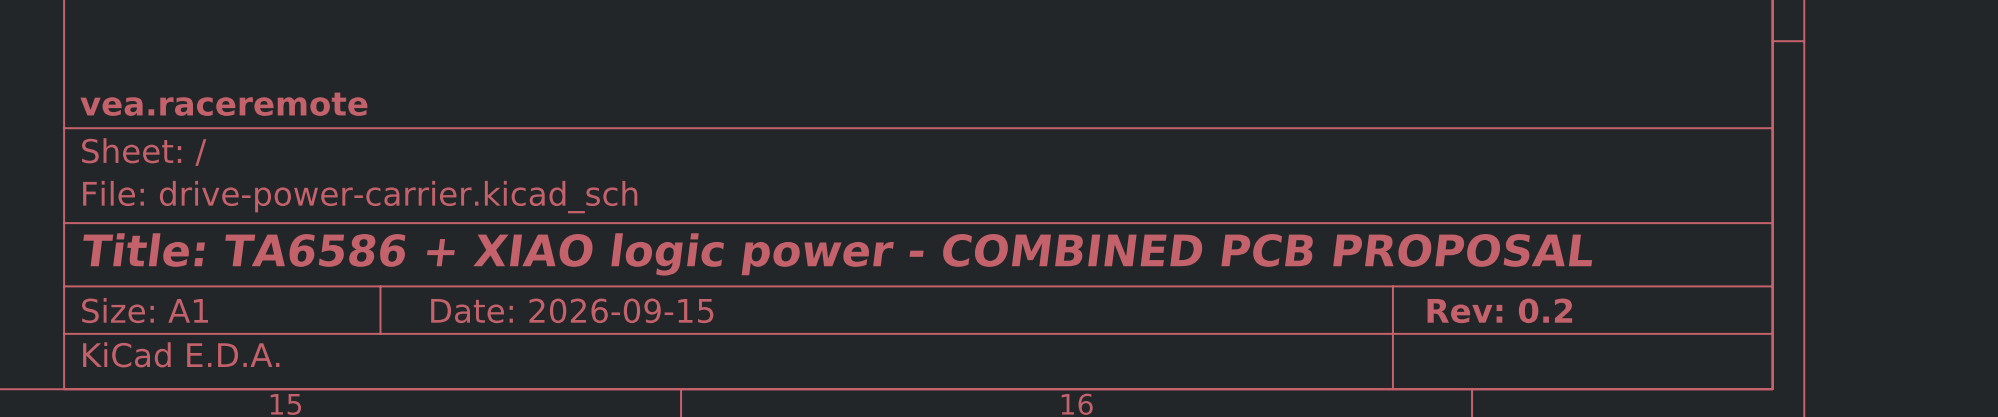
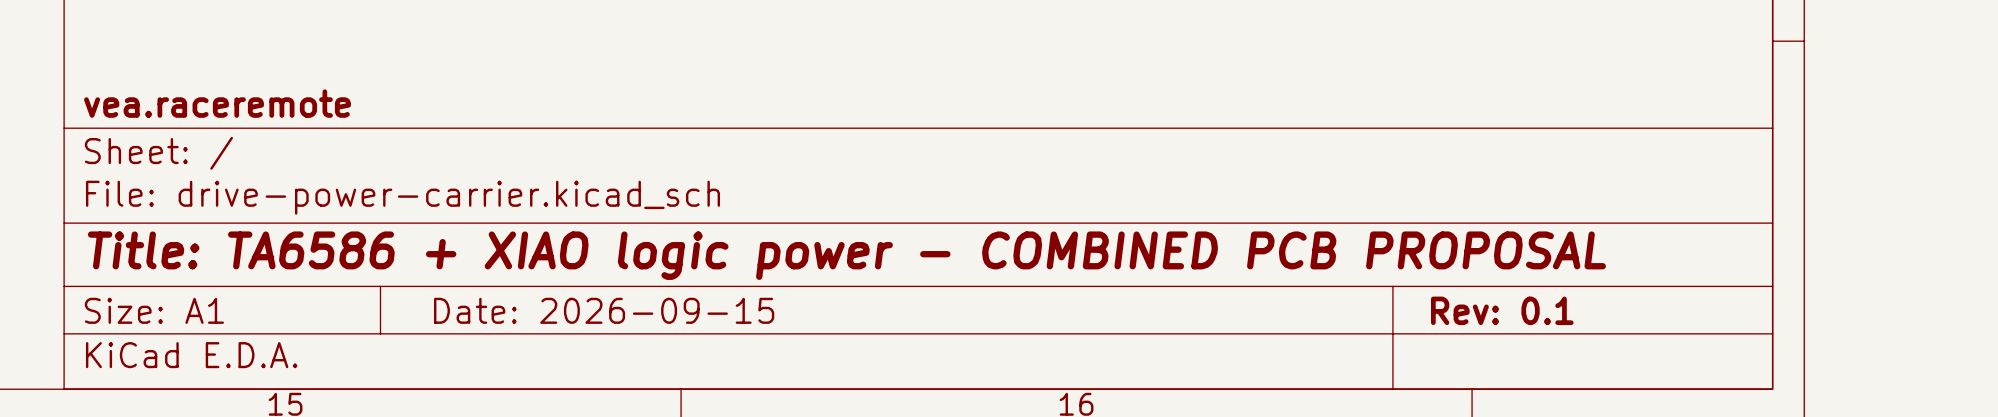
title block: Rev: 0.2 (1499, 310) -> Rev: 0.1 (1502, 310)

